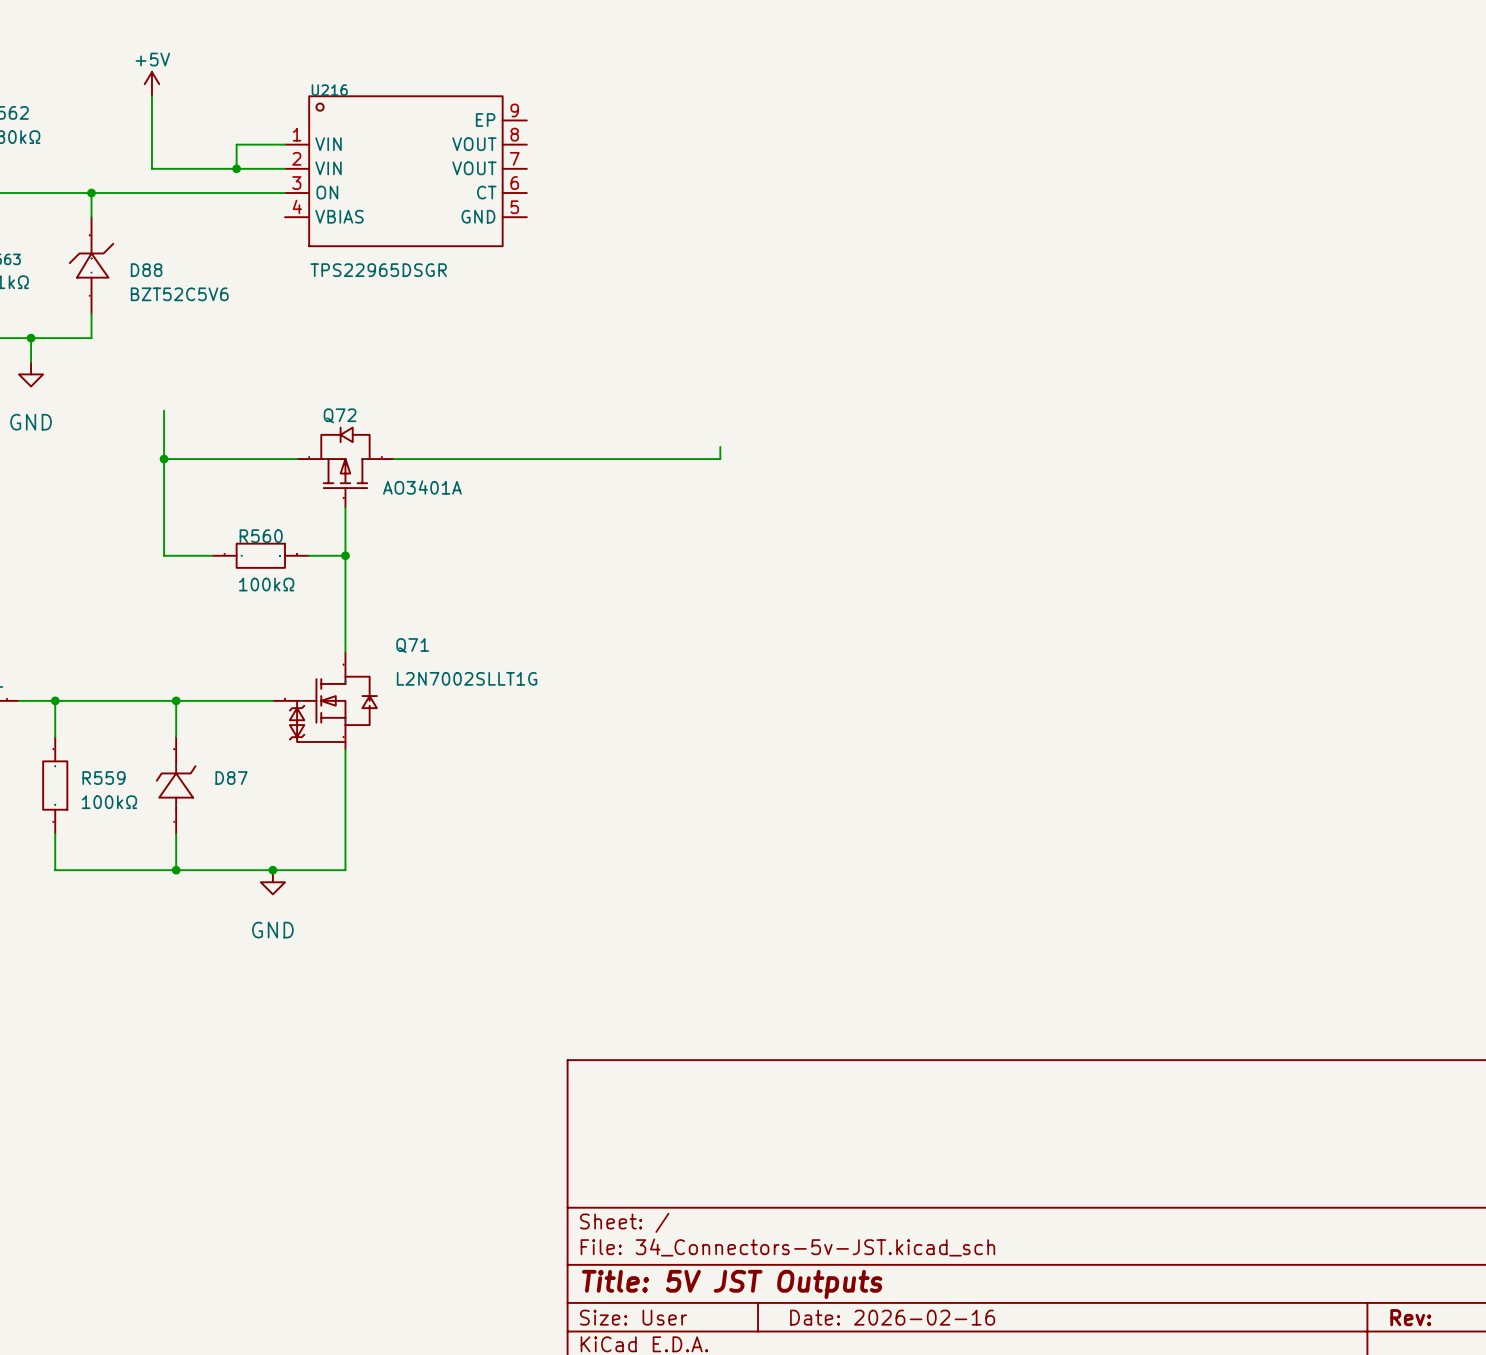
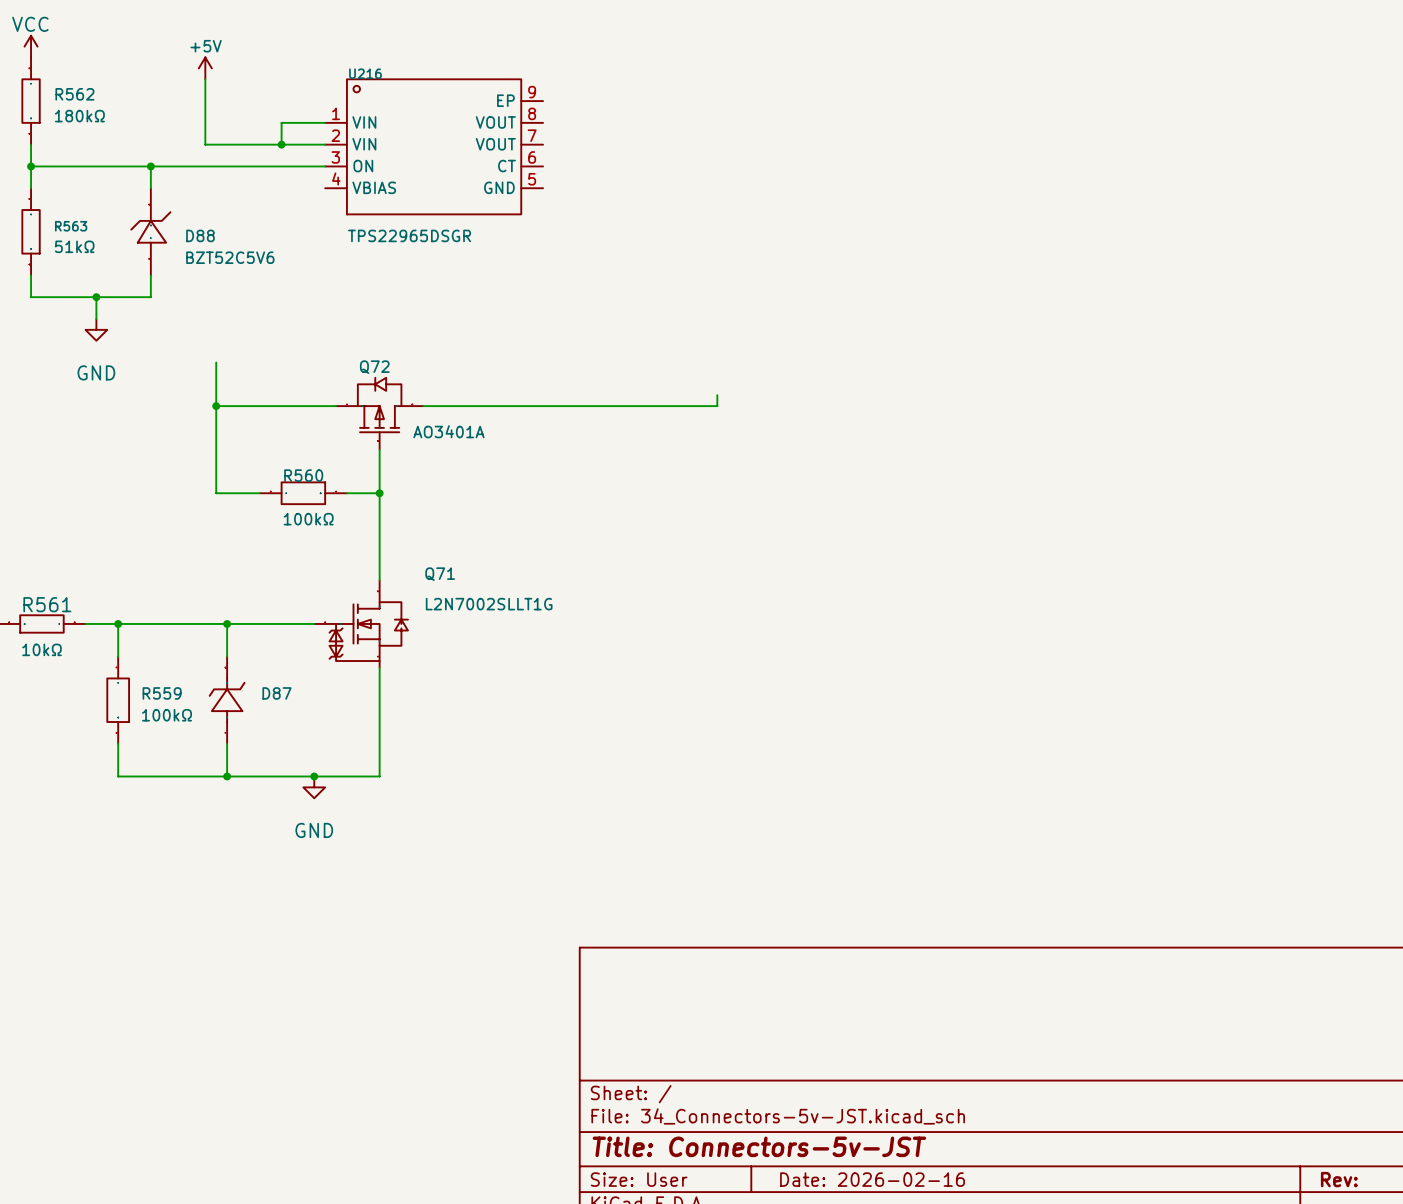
title block: Title: 5V JST Outputs (732, 1284) -> Title: Connectors-5v-JST (759, 1146)

